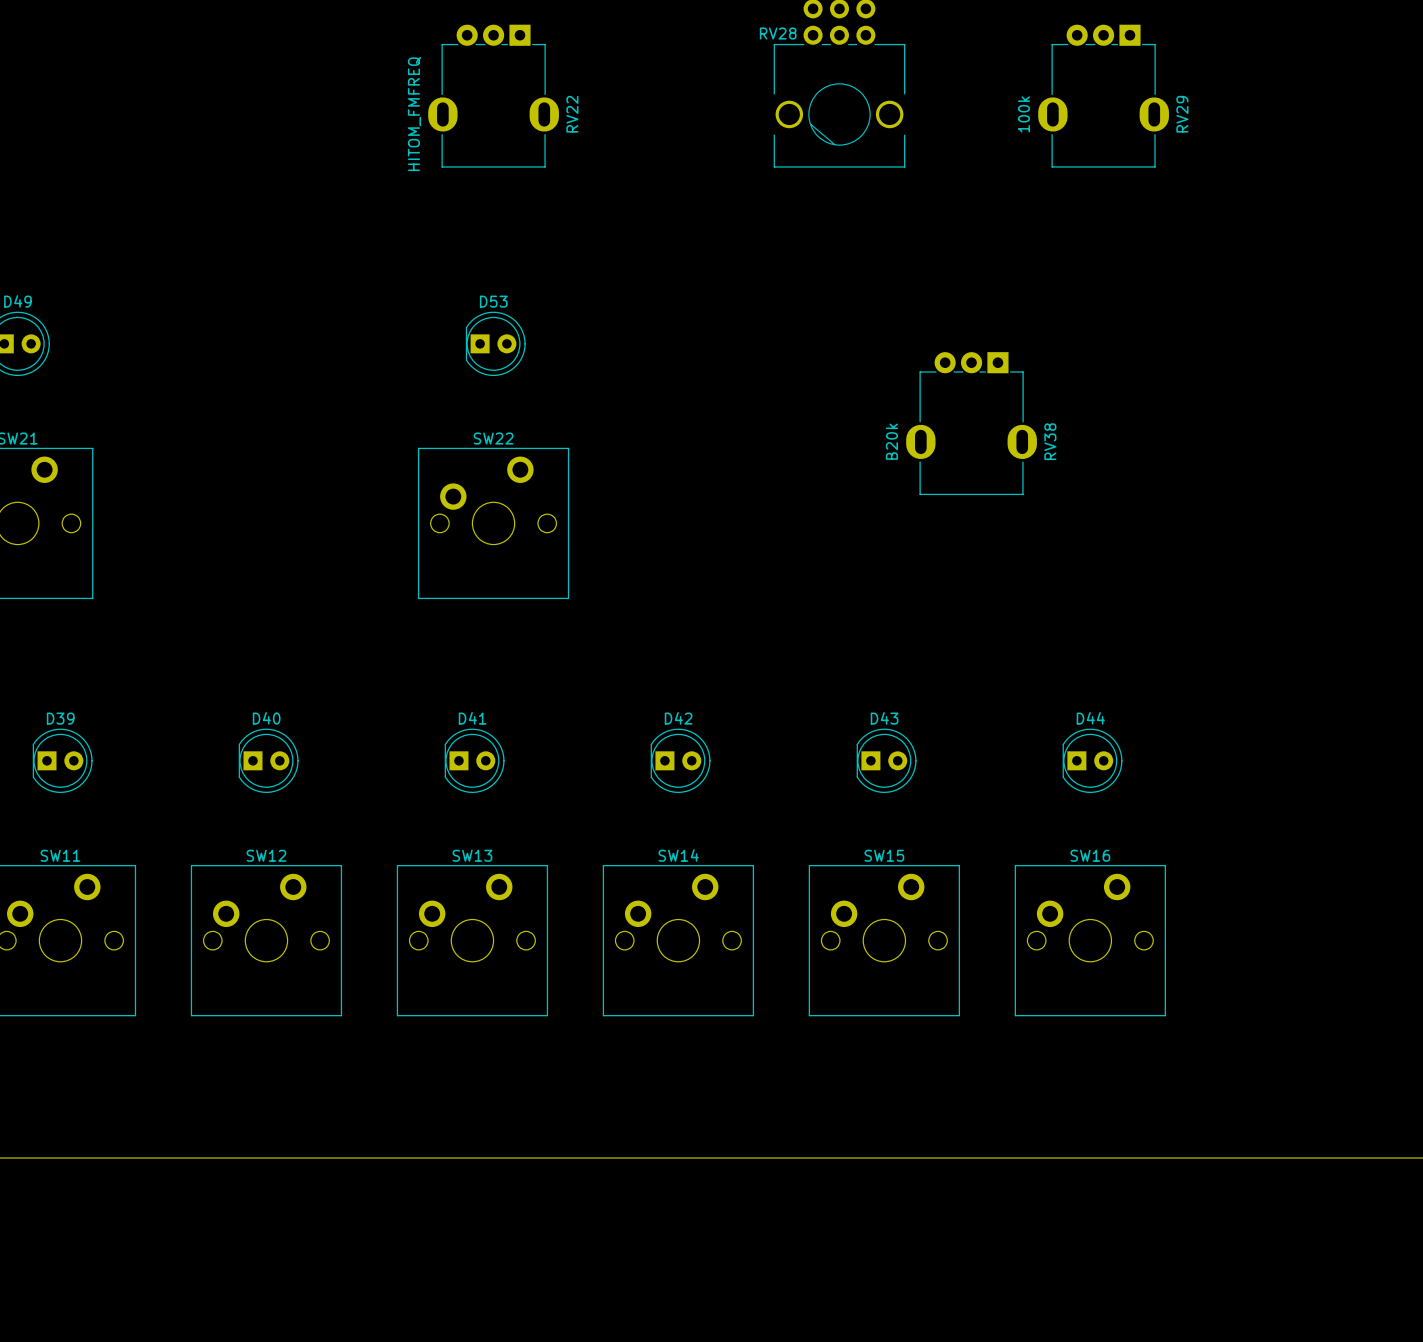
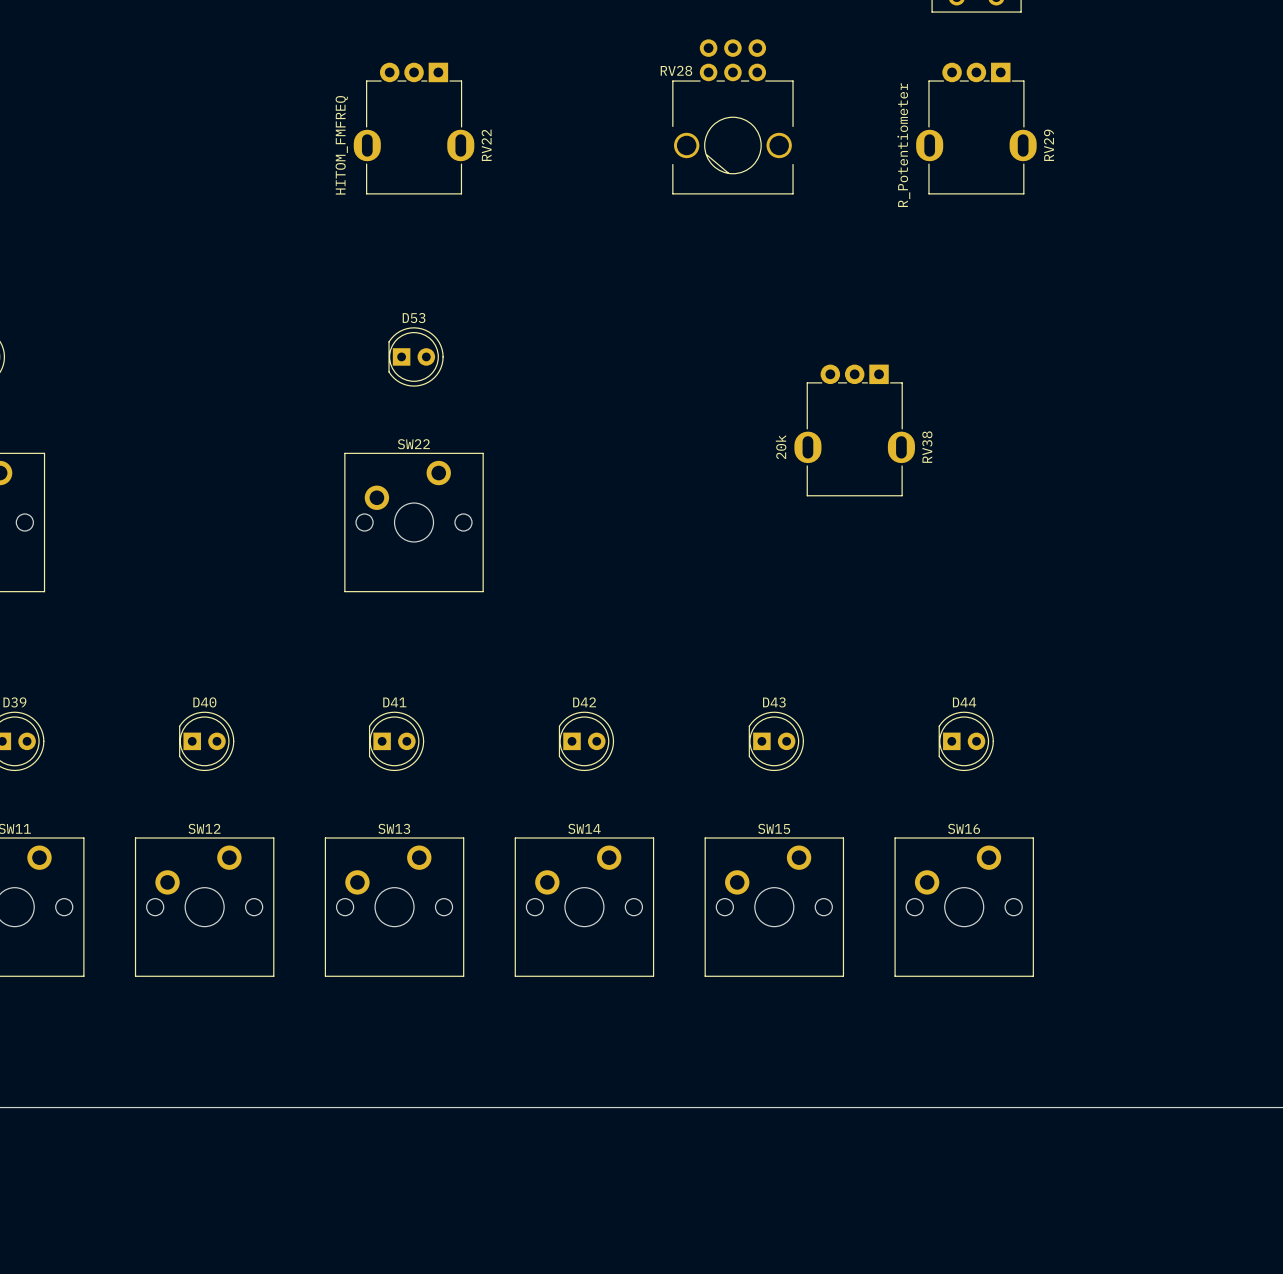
RV29 value: 100k (1023, 114) -> R_Potentiometer (903, 145)
RV38 value: B20k (891, 441) -> 20k (781, 447)

